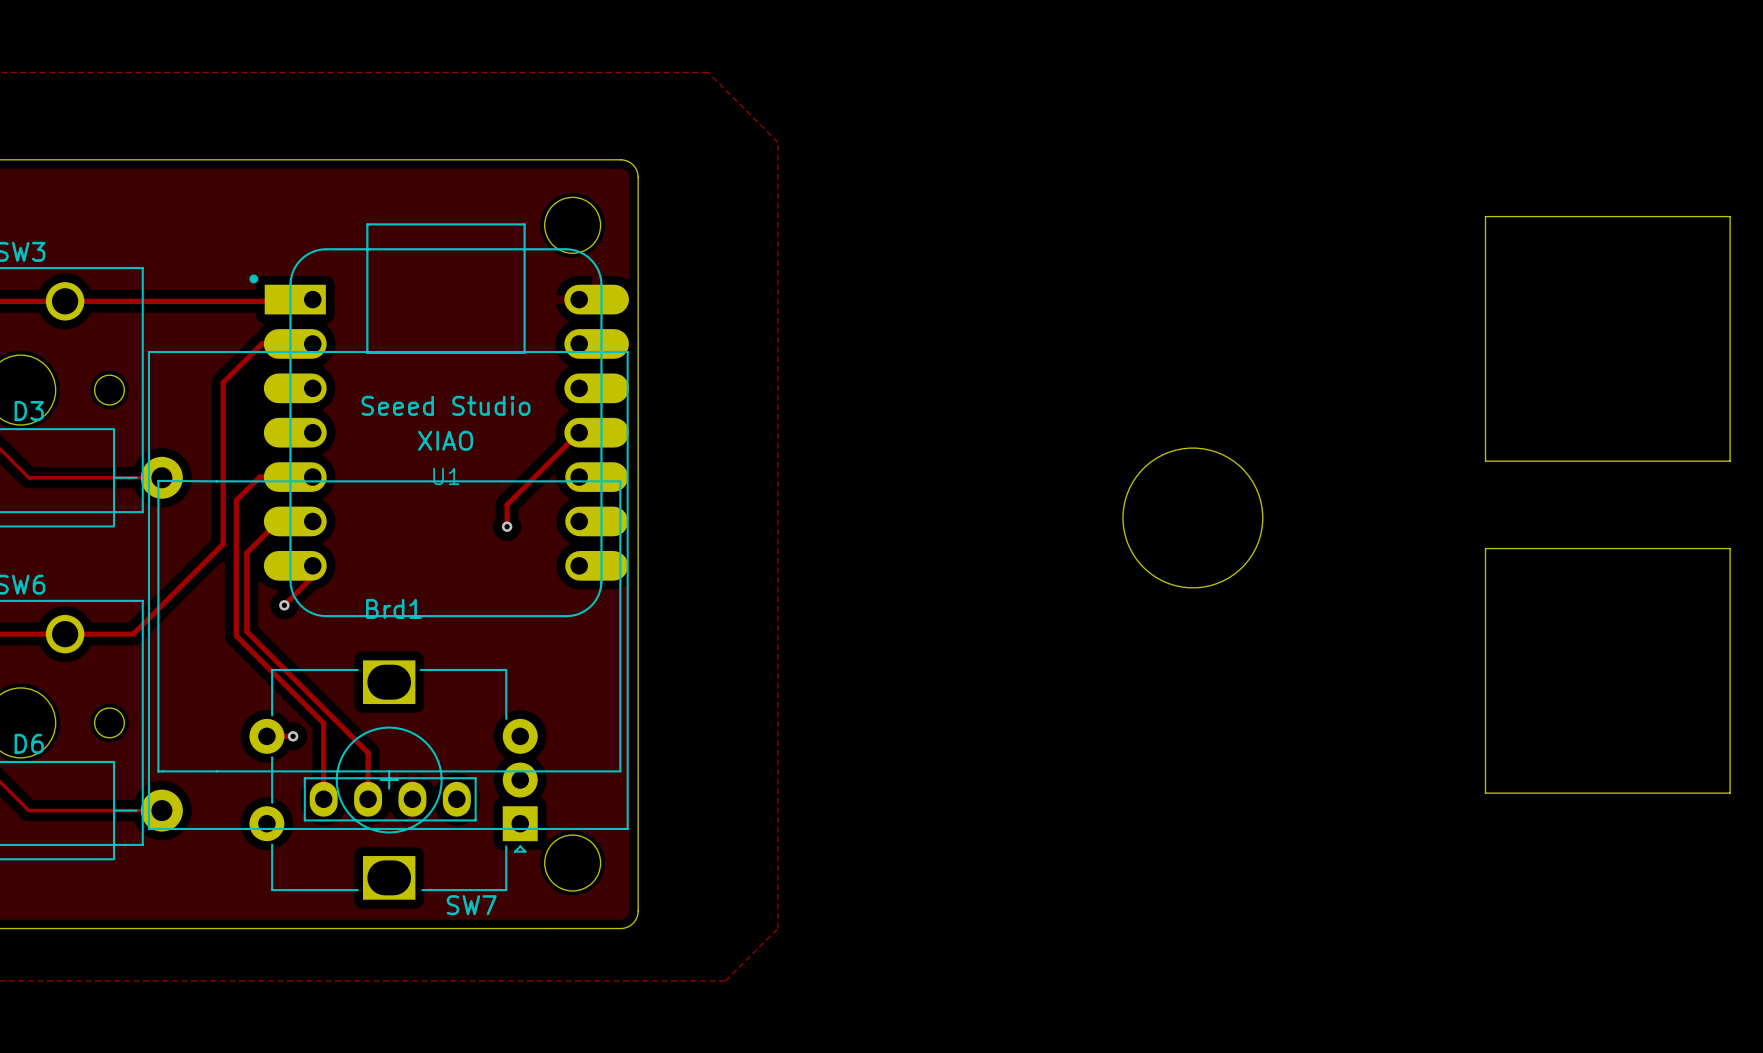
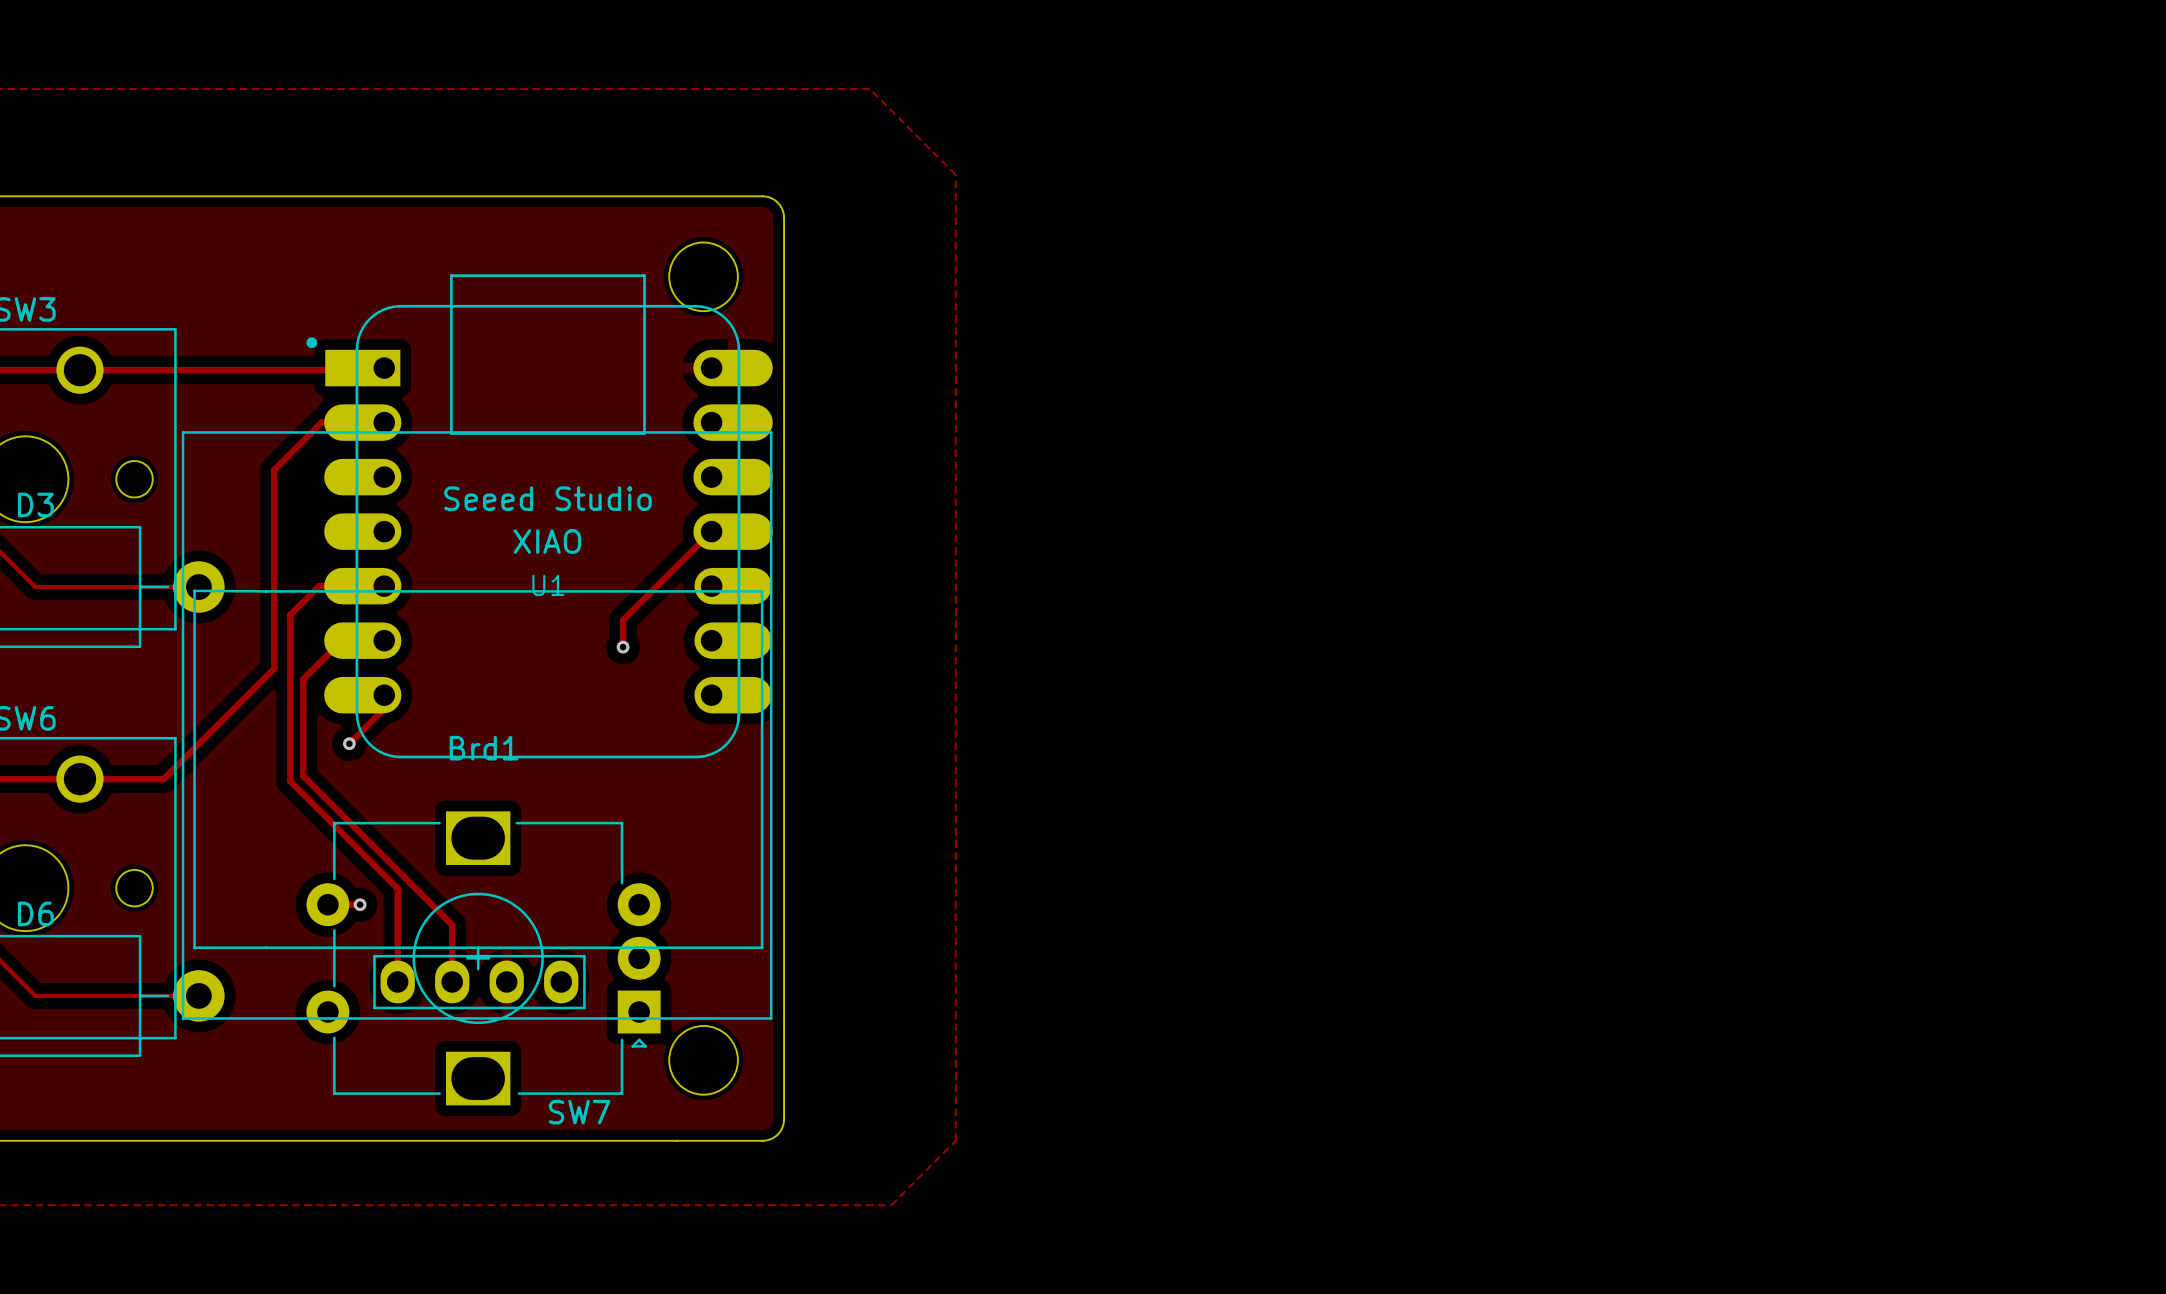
board edge: (1485, 216) (1485, 461) (1730, 461) (1730, 216) (1485, 216) -> none
round board edge: [1122, 447, 1264, 589] -> none
board edge: (1485, 548) (1730, 548) (1730, 793) (1485, 793) (1485, 548) -> none

